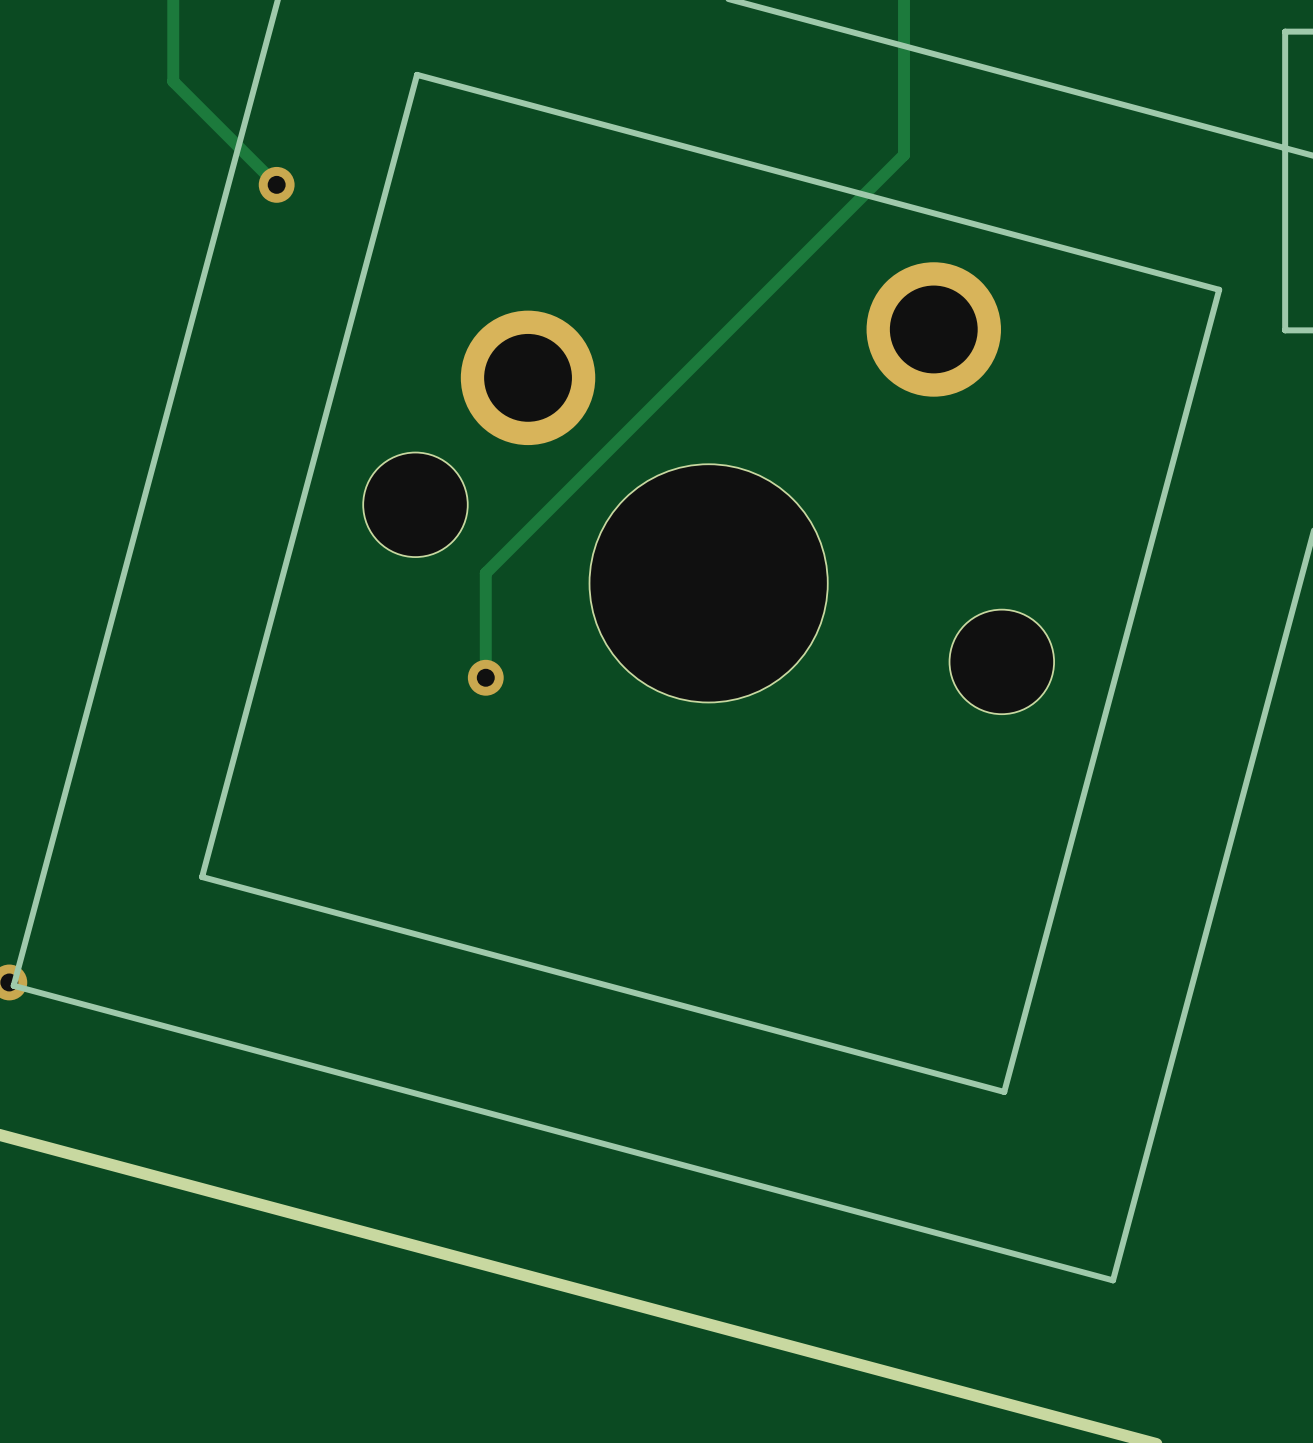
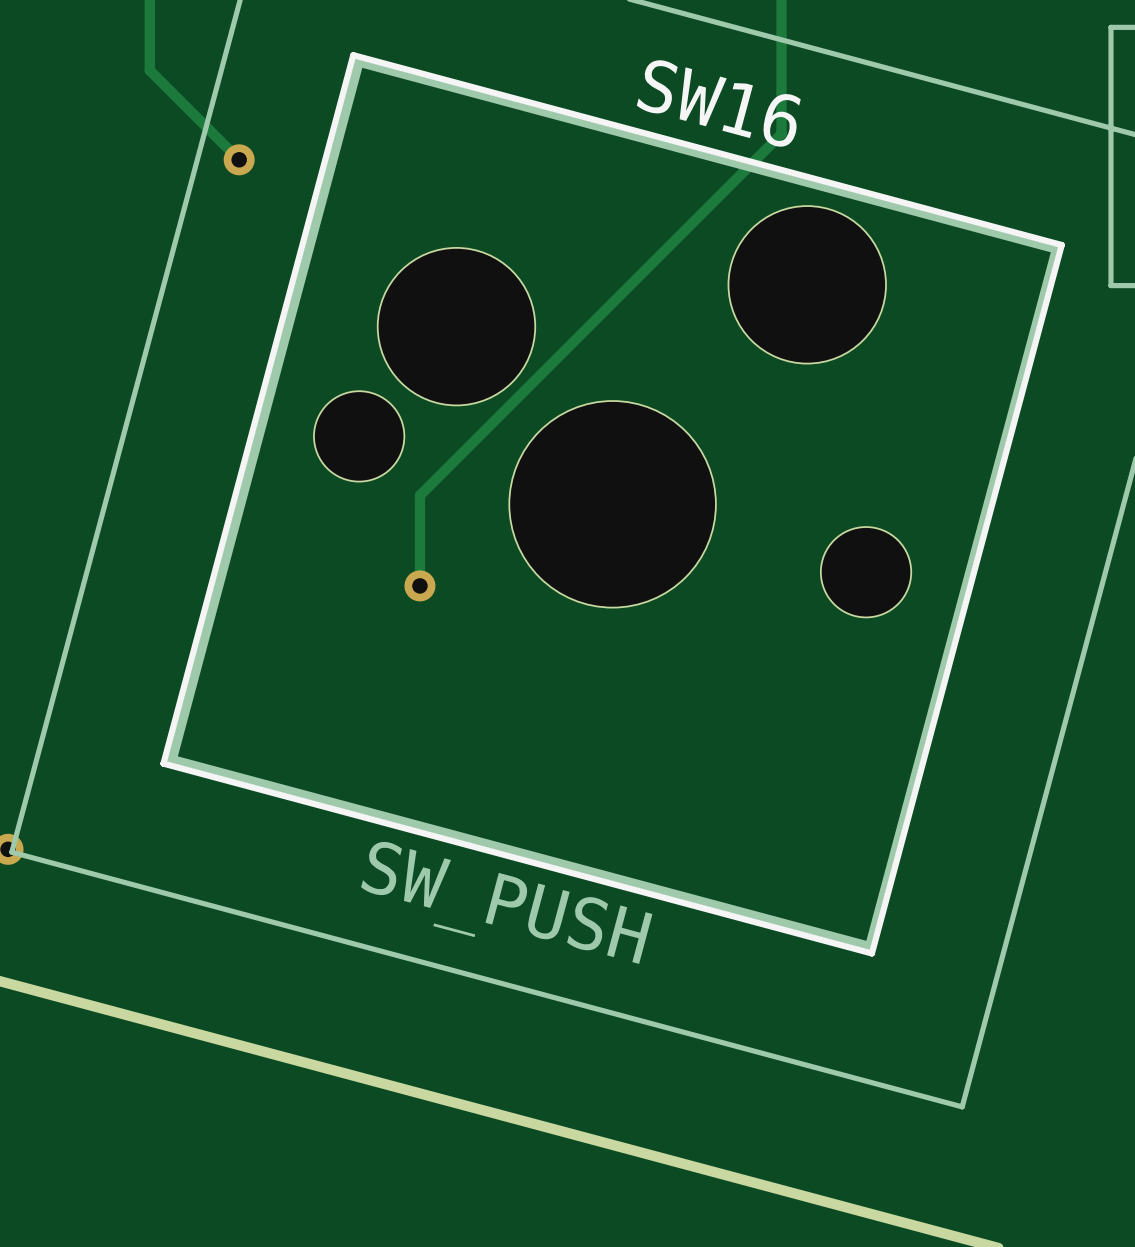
part: (708, 488) -> none
SW16: none -> SW_PUSH (612, 504)

